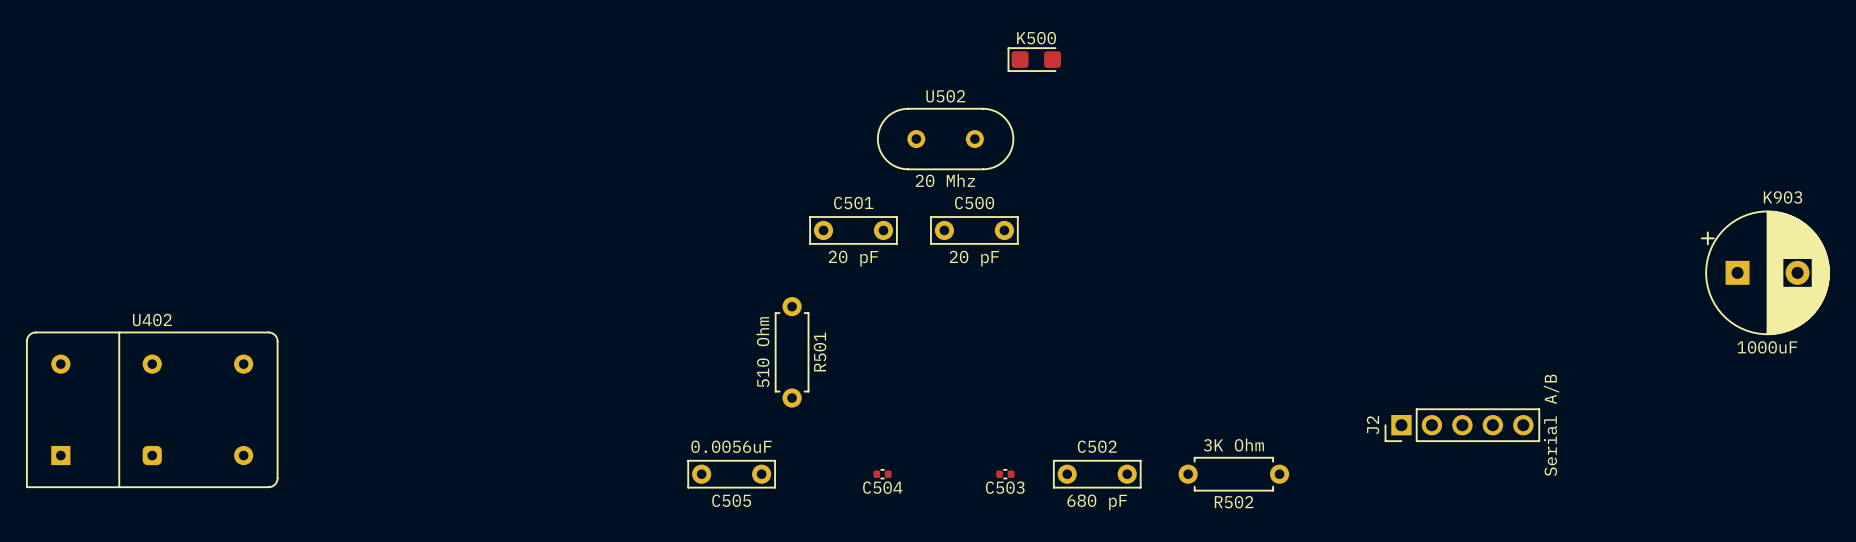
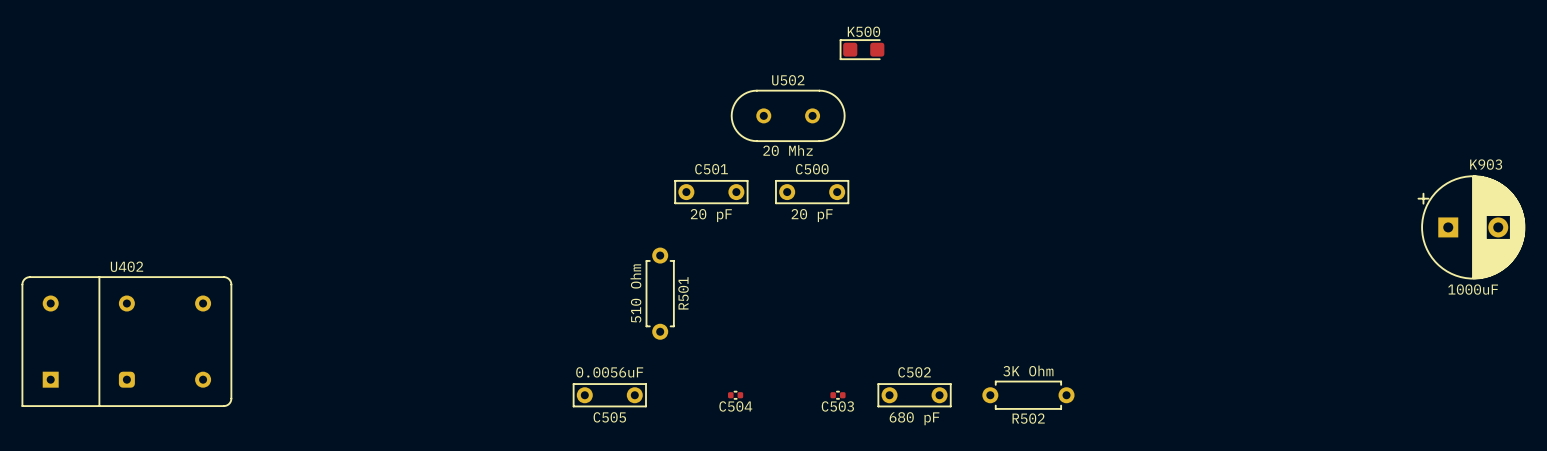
J2: Serial A/B (1462, 425) -> none

